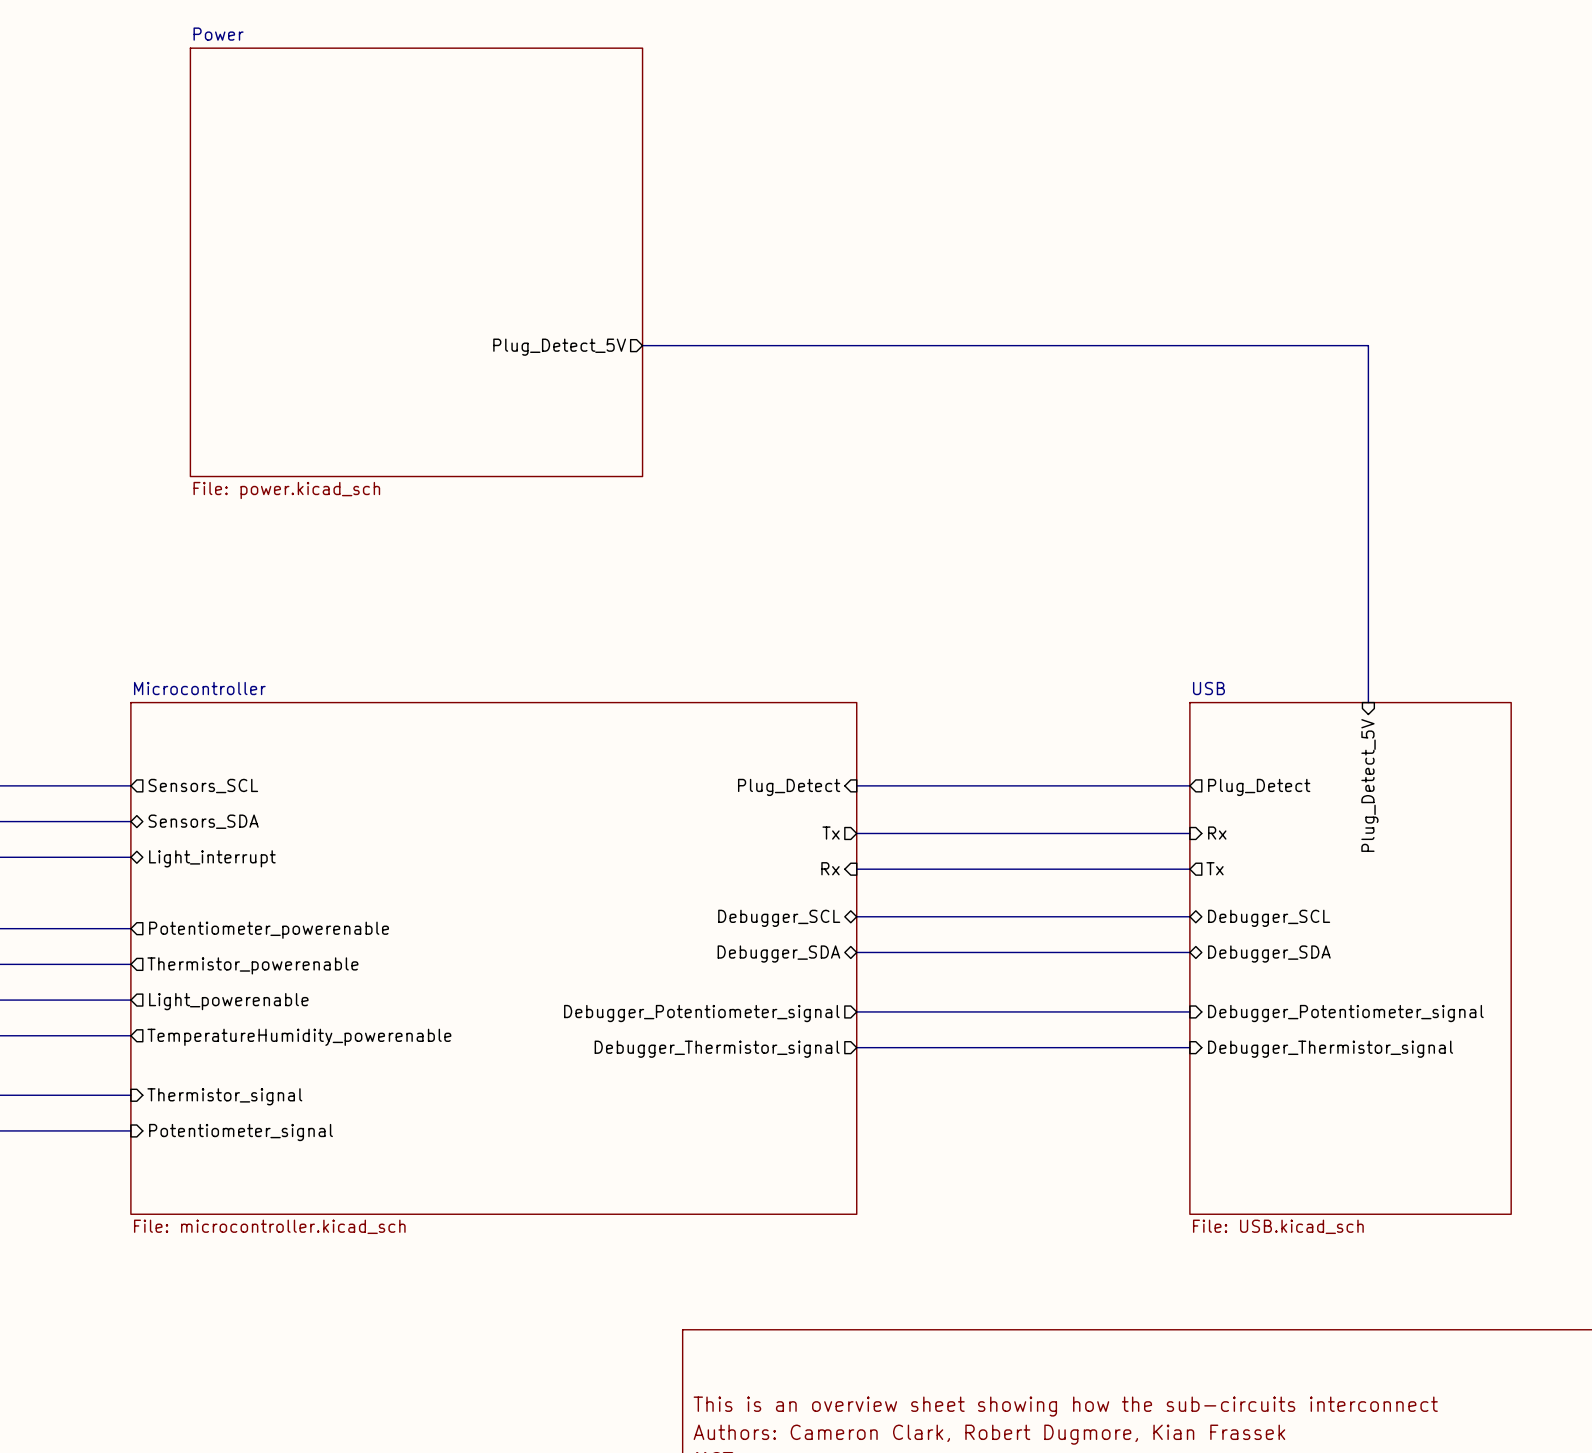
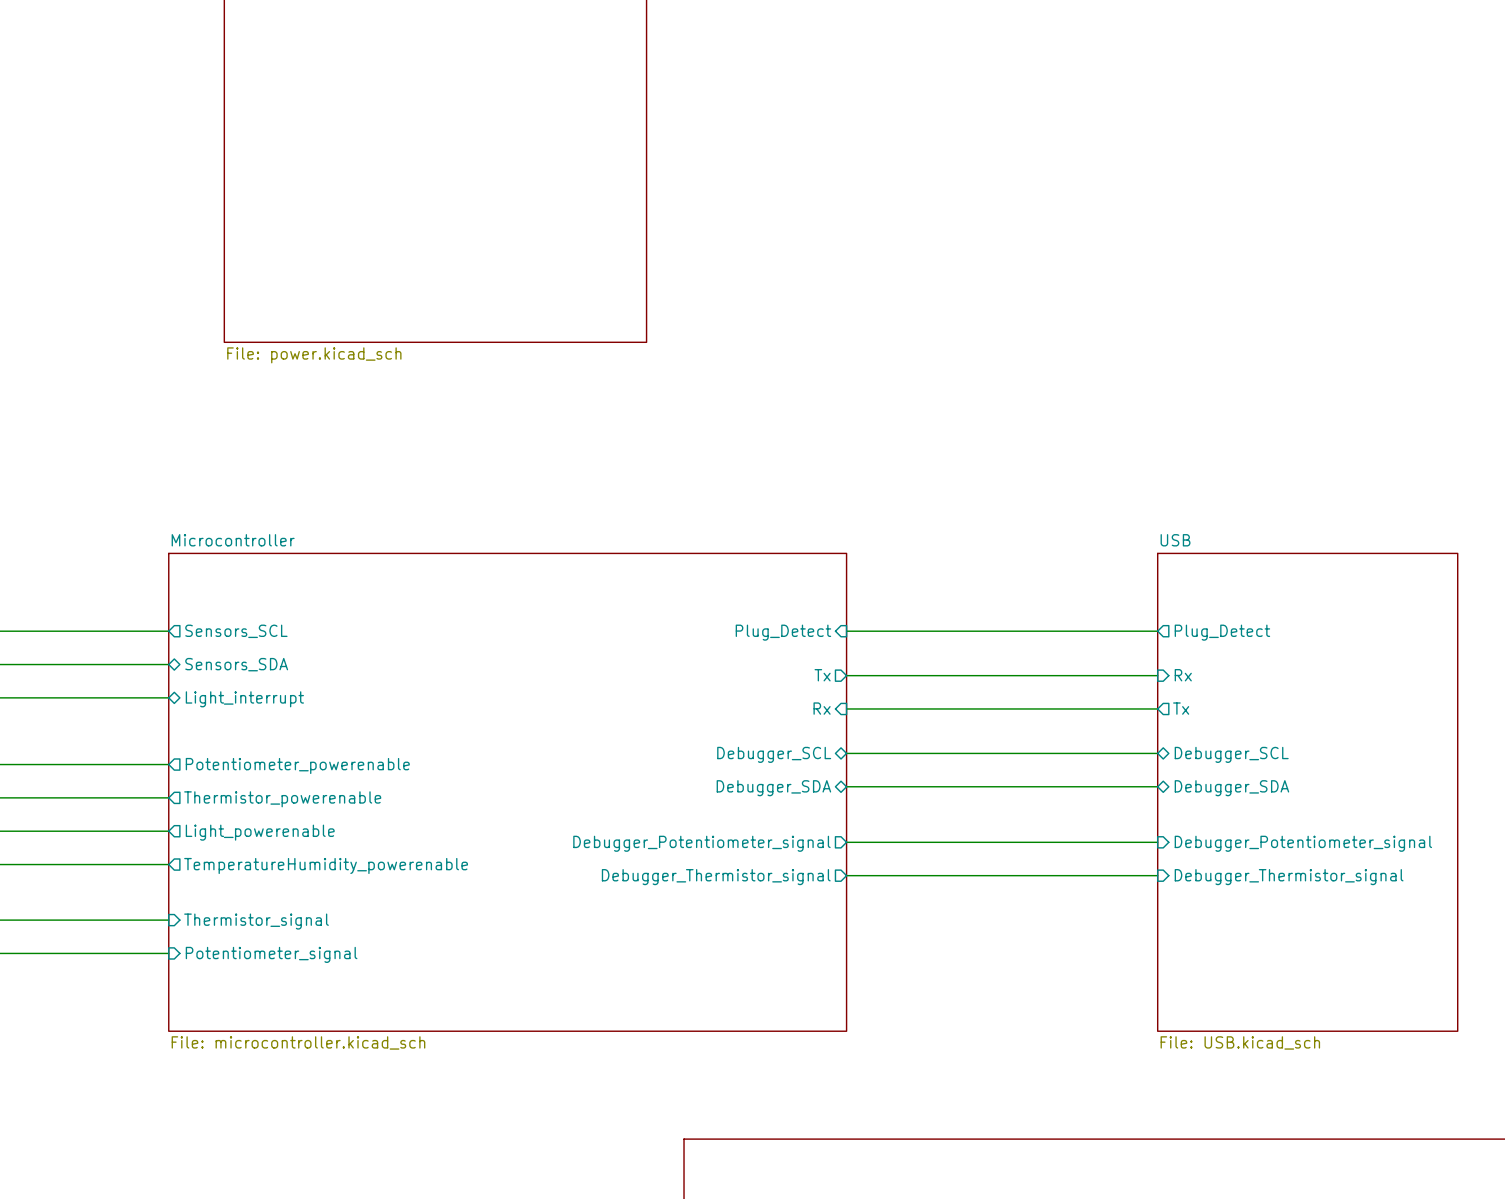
wire: (642, 345) (1368, 345) (1368, 702) -> none
sheet pin: Plug_Detect_5V (559, 347) -> none
sheet pin: Plug_Detect_5V (1369, 785) -> none

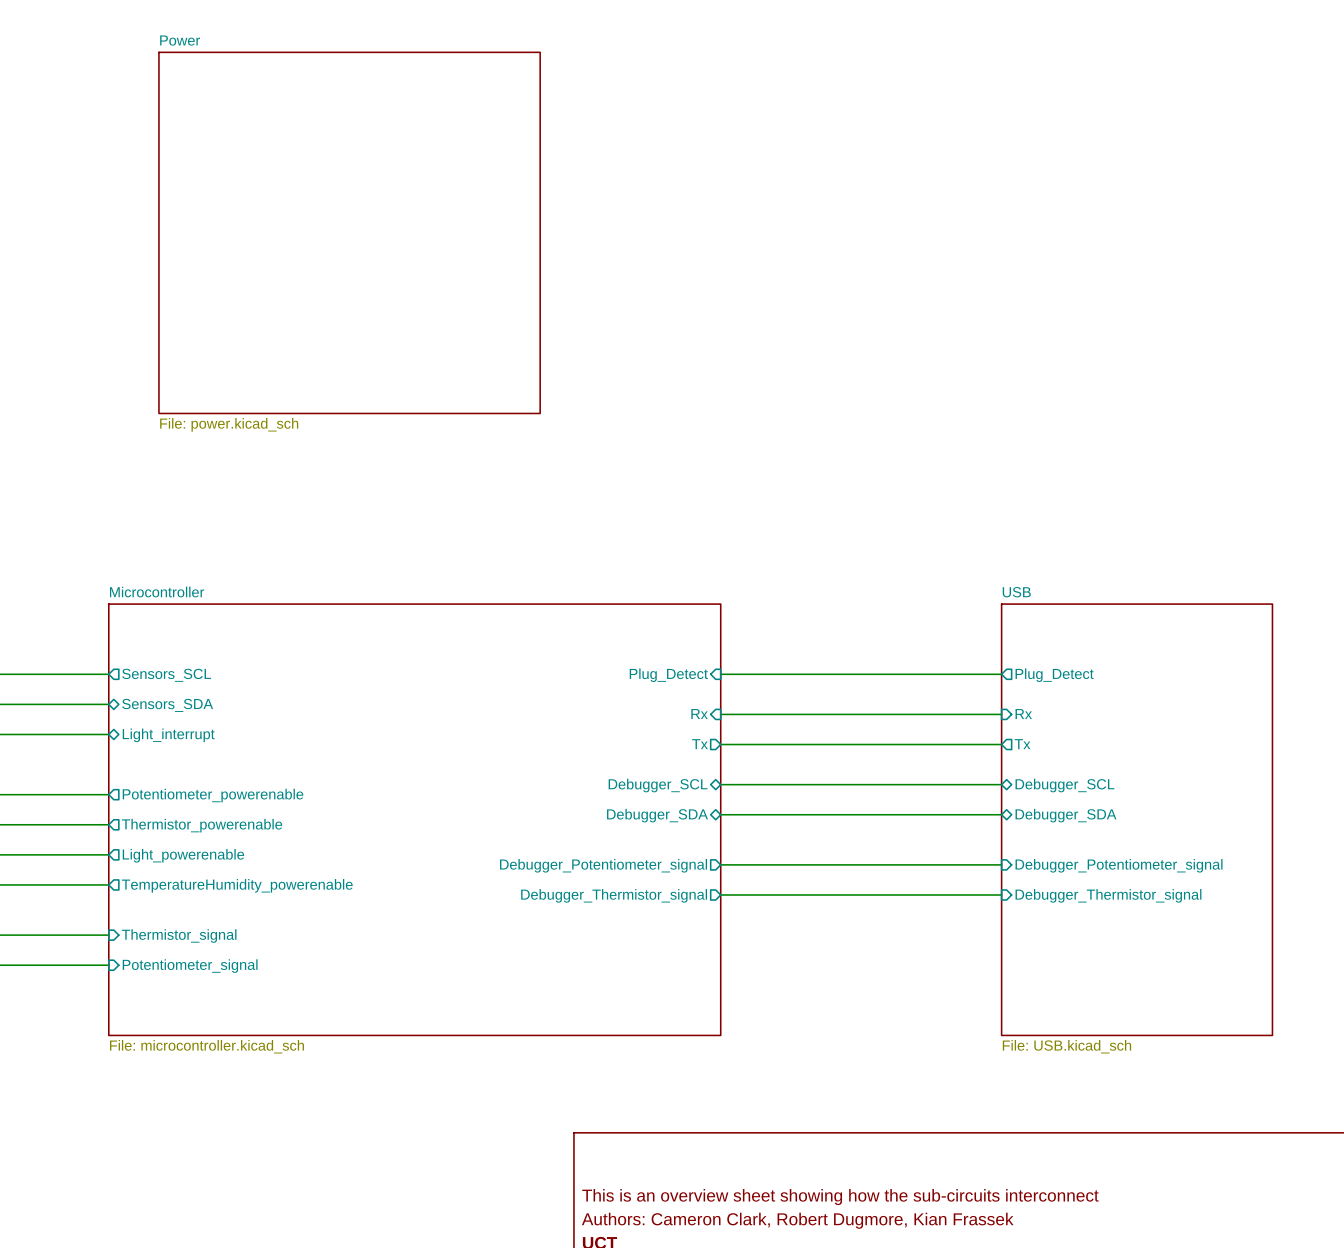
sheet pin shape: output (822, 675) -> input (699, 714)
sheet pin: Tx (822, 675) -> Rx (699, 714)
sheet pin shape: input (822, 708) -> output (699, 744)
sheet pin: Rx (822, 708) -> Tx (699, 744)

